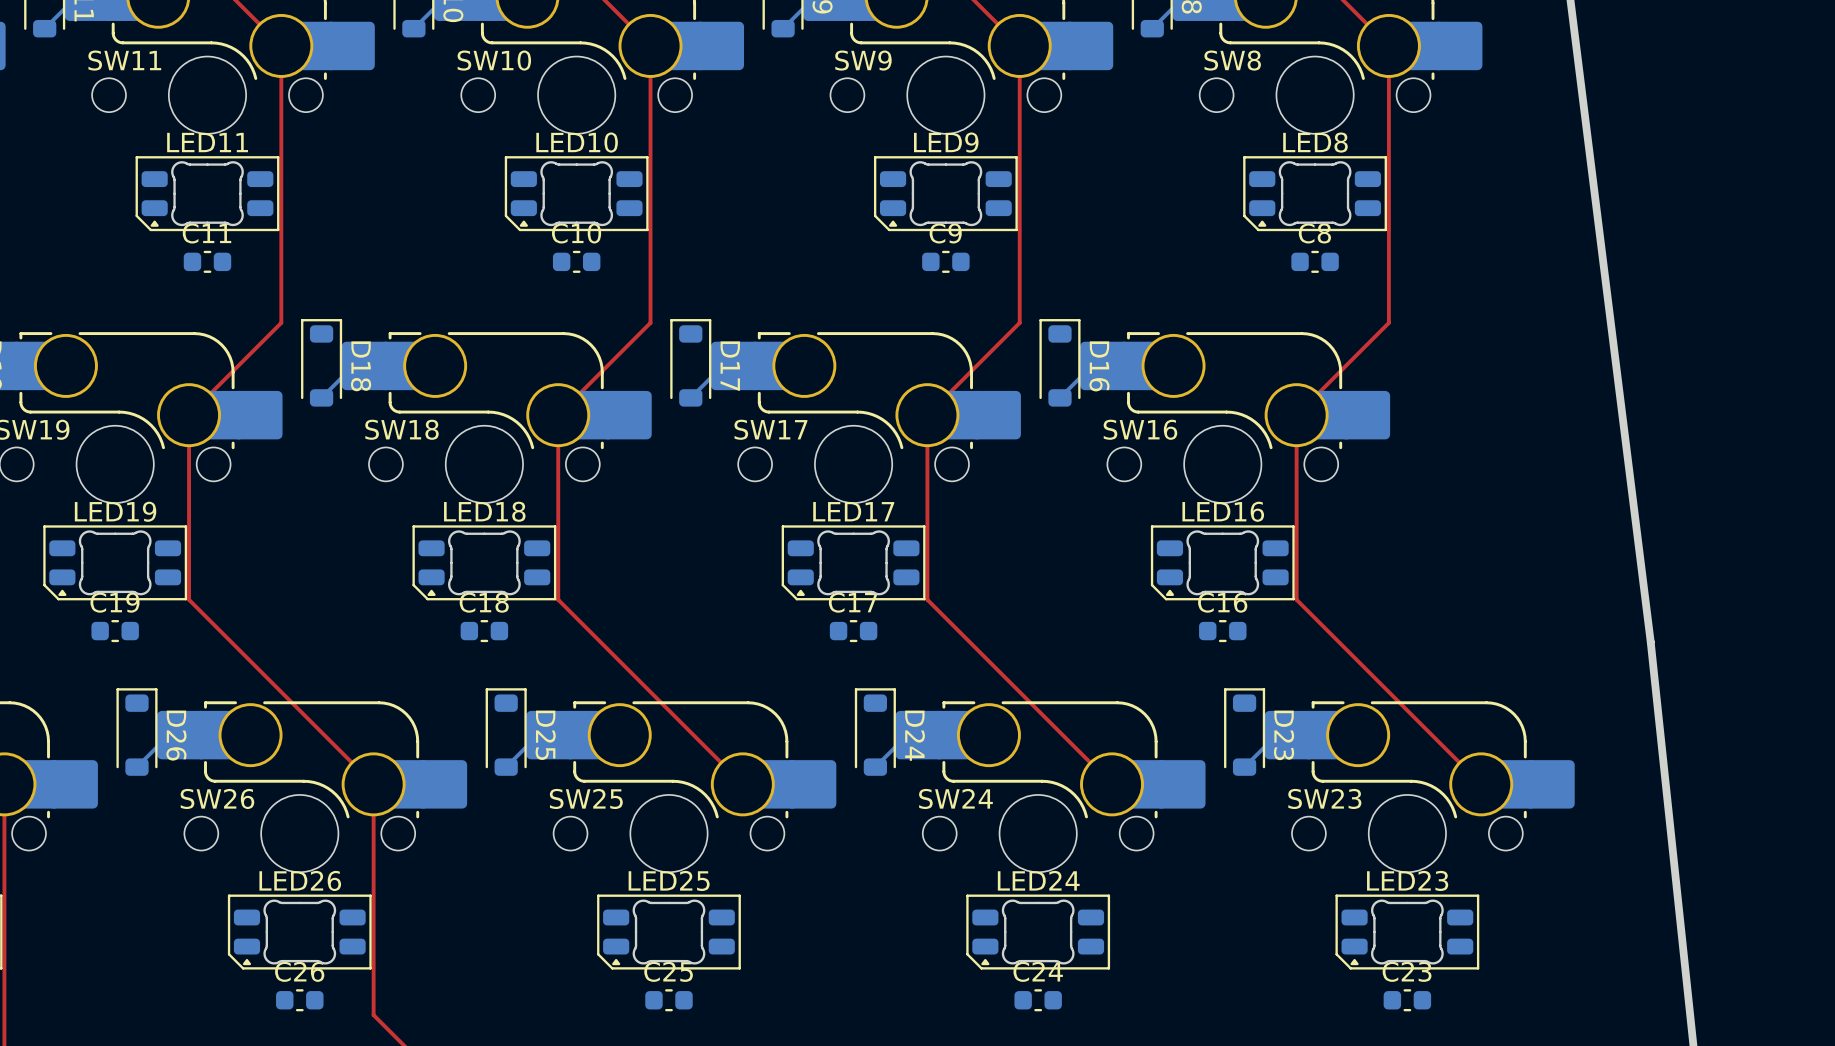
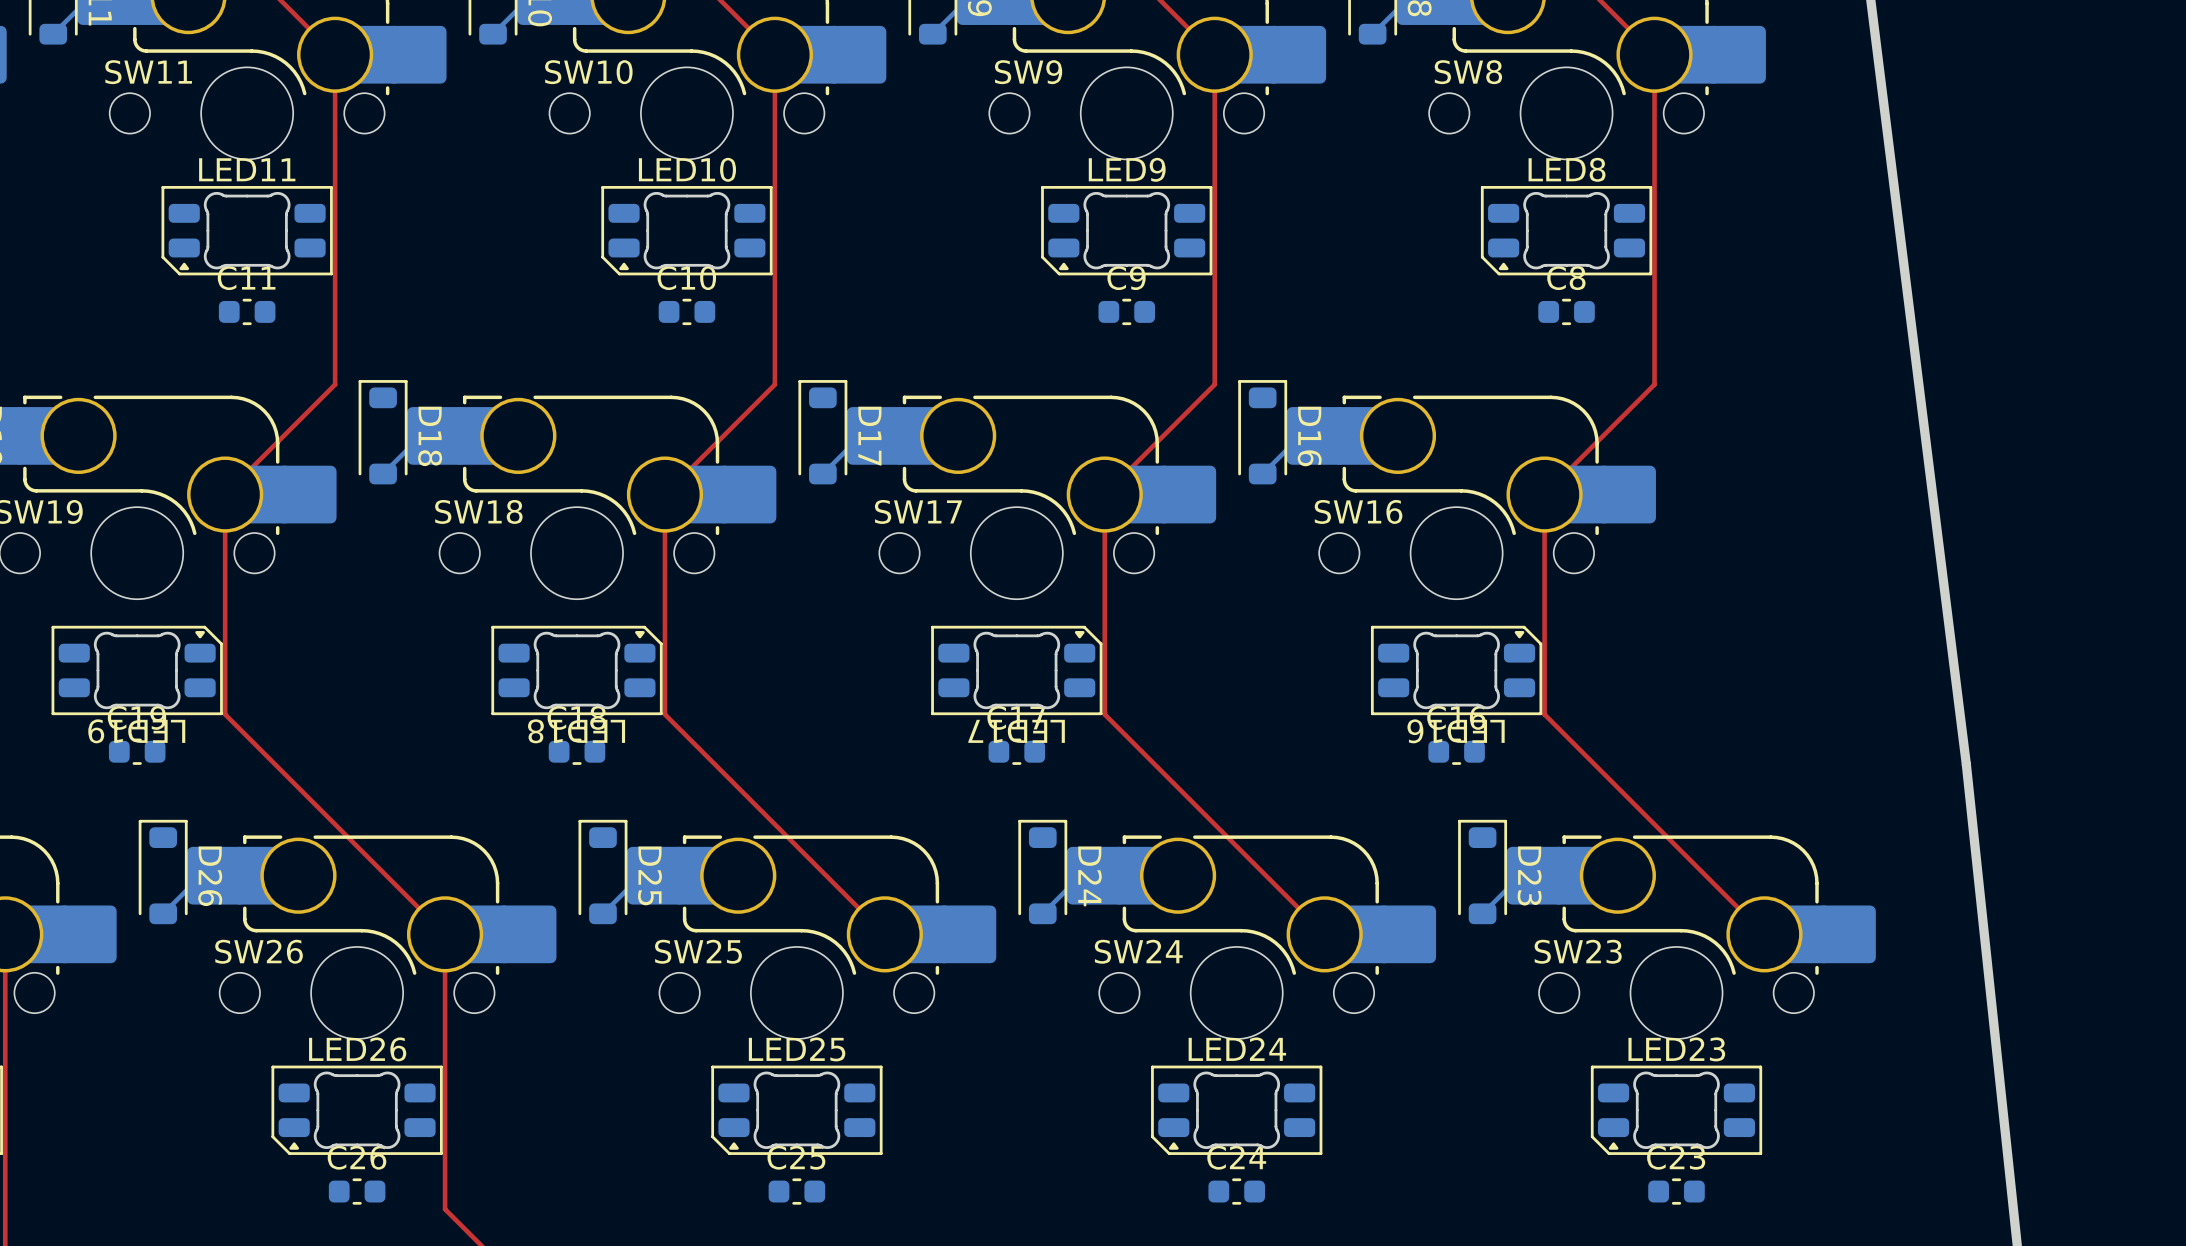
LED19 rotation: 0° (115, 562) -> 180° (137, 670)
LED18 rotation: 0° (484, 562) -> 180° (577, 670)
LED17 rotation: 0° (853, 562) -> 180° (1016, 670)
LED16 rotation: 0° (1222, 562) -> 180° (1456, 670)

